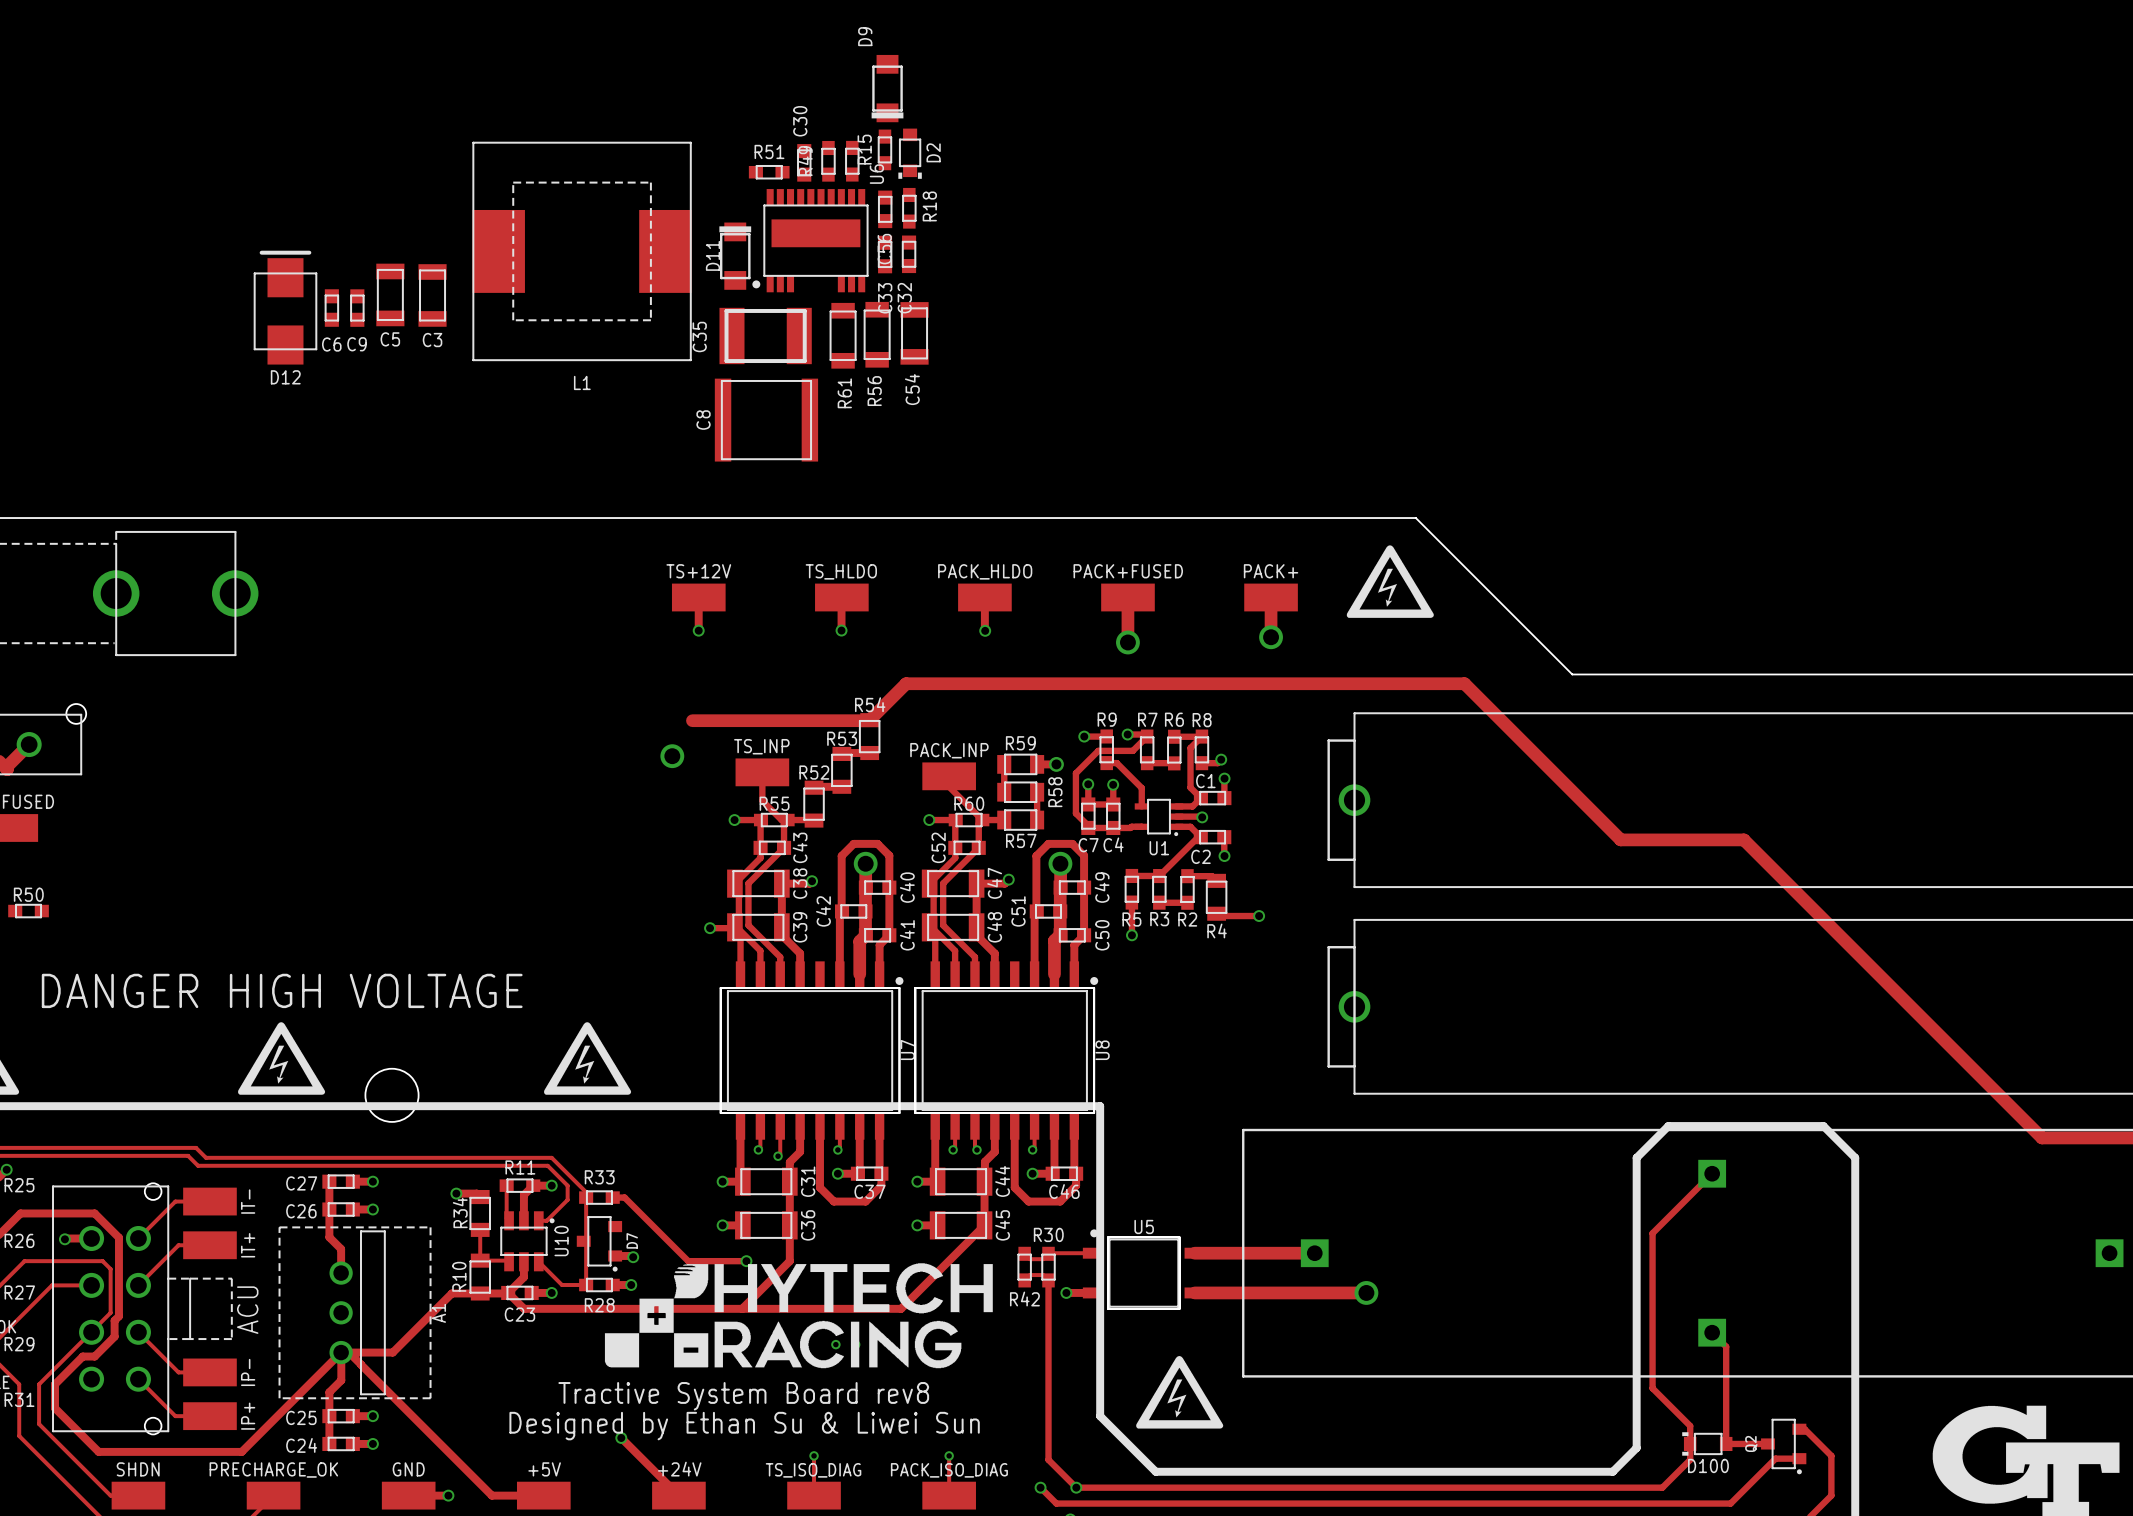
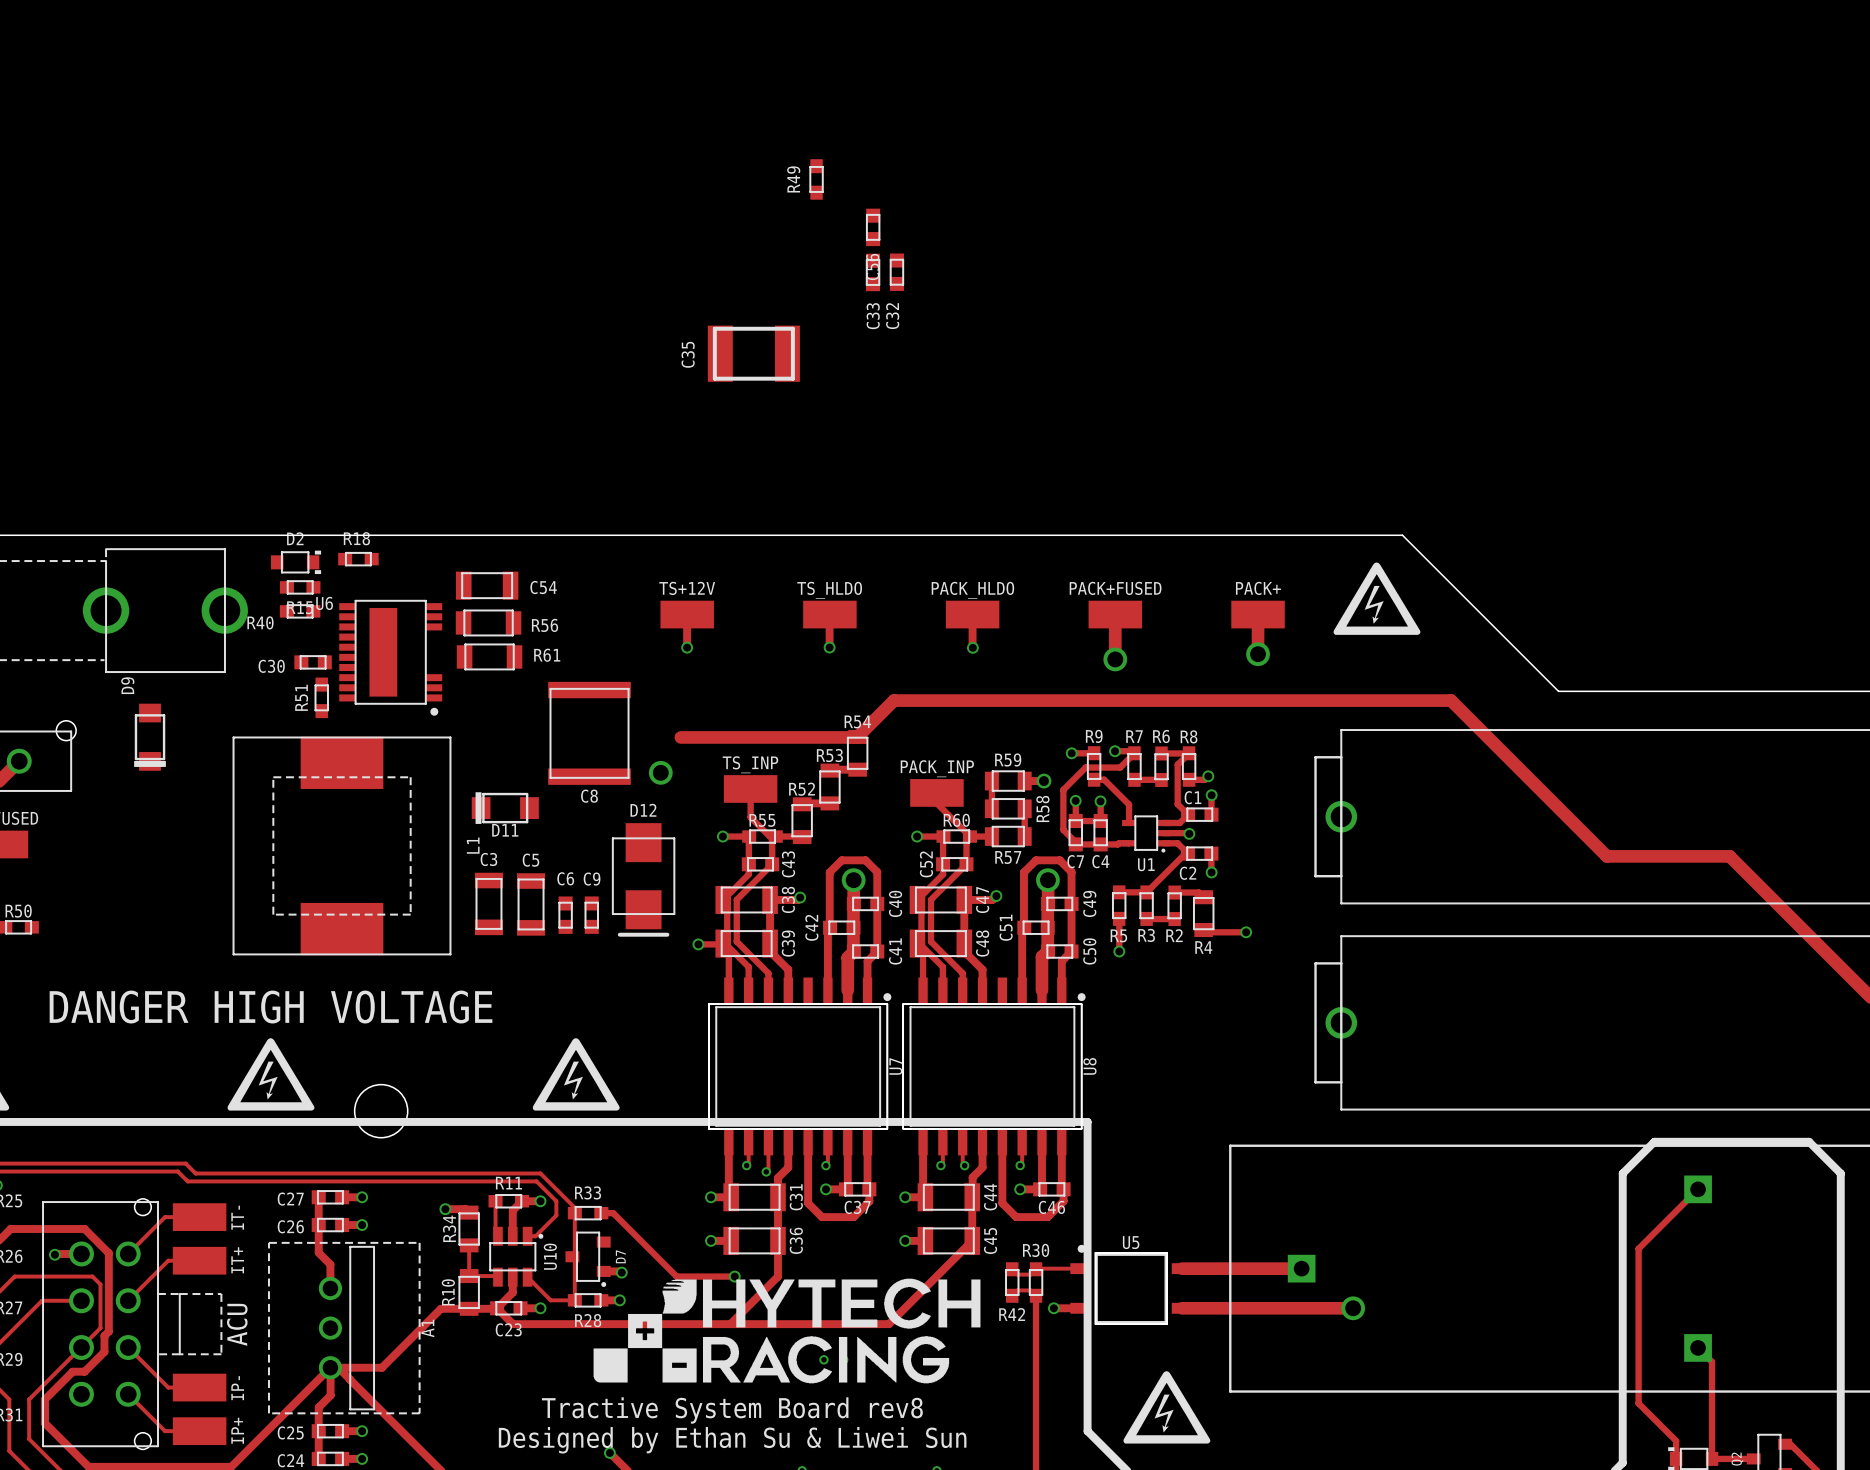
D9 position: (887, 88) -> (150, 737)
C30 name position: C30 (800, 121) -> C30 (271, 666)
R15 rotation: 0° (884, 149) -> 90° clockwise (300, 587)
R15 position: (884, 149) -> (300, 587)
D2 rotation: 0° (910, 153) -> 90° counterclockwise (296, 562)
D2 position: (910, 153) -> (296, 562)
part: (852, 161) -> none
C30 rotation: 0° (804, 162) -> 90° clockwise (313, 662)
C30 position: (804, 162) -> (313, 662)
R51 rotation: 0° (769, 172) -> 90° clockwise (321, 697)
R51 position: (769, 172) -> (321, 697)
R18 rotation: 0° (909, 208) -> 90° clockwise (358, 559)
R18 position: (909, 208) -> (358, 559)
U6 rotation: 0° (810, 240) -> 90° counterclockwise (390, 657)
U6 position: (810, 240) -> (390, 657)
L1 rotation: 0° (582, 251) -> 90° clockwise (342, 845)
L1 position: (582, 251) -> (342, 845)
D11 rotation: 0° (735, 256) -> 90° counterclockwise (505, 808)
D11 position: (735, 256) -> (505, 808)
C5 position: (390, 294) -> (531, 904)
C3 position: (432, 295) -> (488, 903)
D12 rotation: 0° (285, 307) -> 180° (643, 879)
D12 position: (285, 307) -> (643, 879)
C6 position: (331, 308) -> (565, 915)
C9 position: (357, 308) -> (591, 915)
C54 rotation: 0° (914, 333) -> 90° clockwise (487, 585)
C54 position: (914, 333) -> (487, 585)
R56 rotation: 0° (877, 334) -> 90° clockwise (488, 622)
R56 position: (877, 334) -> (488, 622)
R61 rotation: 0° (843, 335) -> 90° clockwise (489, 656)
R61 position: (843, 335) -> (489, 656)
C5 name position: C5 (390, 339) -> C5 (530, 860)
C3 name position: C3 (432, 340) -> C3 (488, 859)
C6 name position: C6 (331, 344) -> C6 (565, 878)
C9 name position: C9 (357, 344) -> C9 (592, 879)
L1 name position: L1 (582, 382) -> L1 (473, 845)
C54 name position: C54 (912, 389) -> C54 (543, 587)
R56 name position: R56 (874, 391) -> R56 (545, 625)
R61 name position: R61 (844, 393) -> R61 (547, 655)
C8 name position: C8 (703, 420) -> C8 (589, 796)
C8 rotation: 0° (766, 420) -> 90° clockwise (589, 733)
C8 position: (766, 420) -> (589, 733)
R40: none -> (300, 611)

